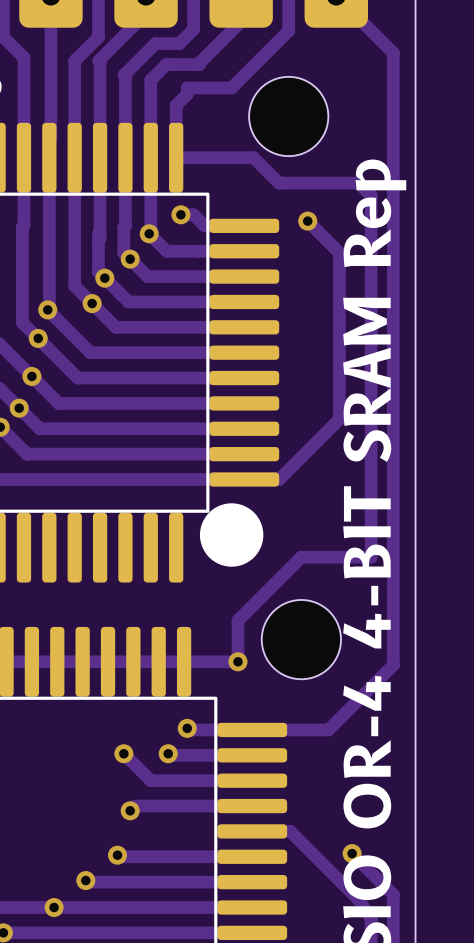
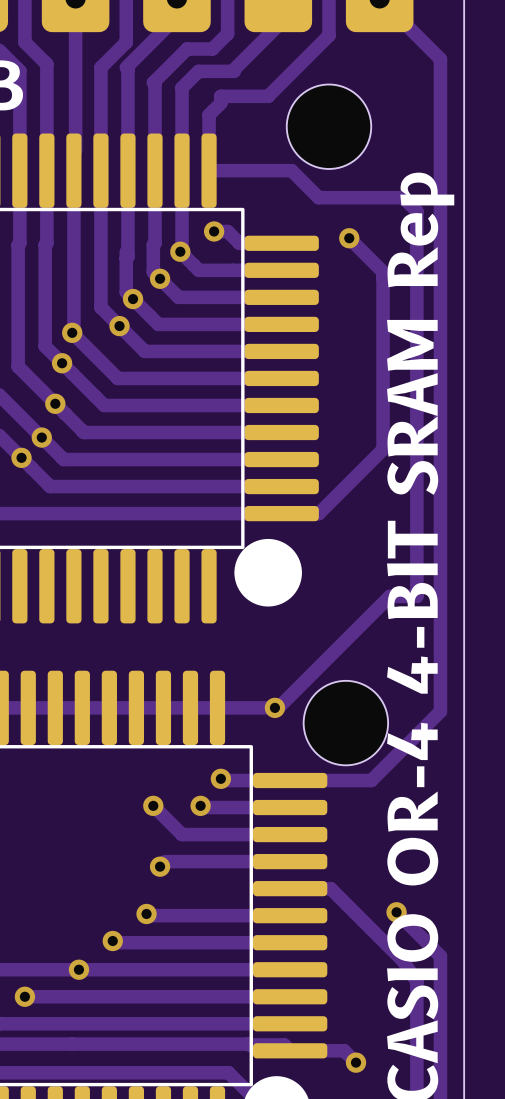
track: (345, 557) (301, 557) (237, 620) (237, 661) -> (389, 596) (278, 707) (274, 707)
part position: (301, 639) -> (345, 723)

